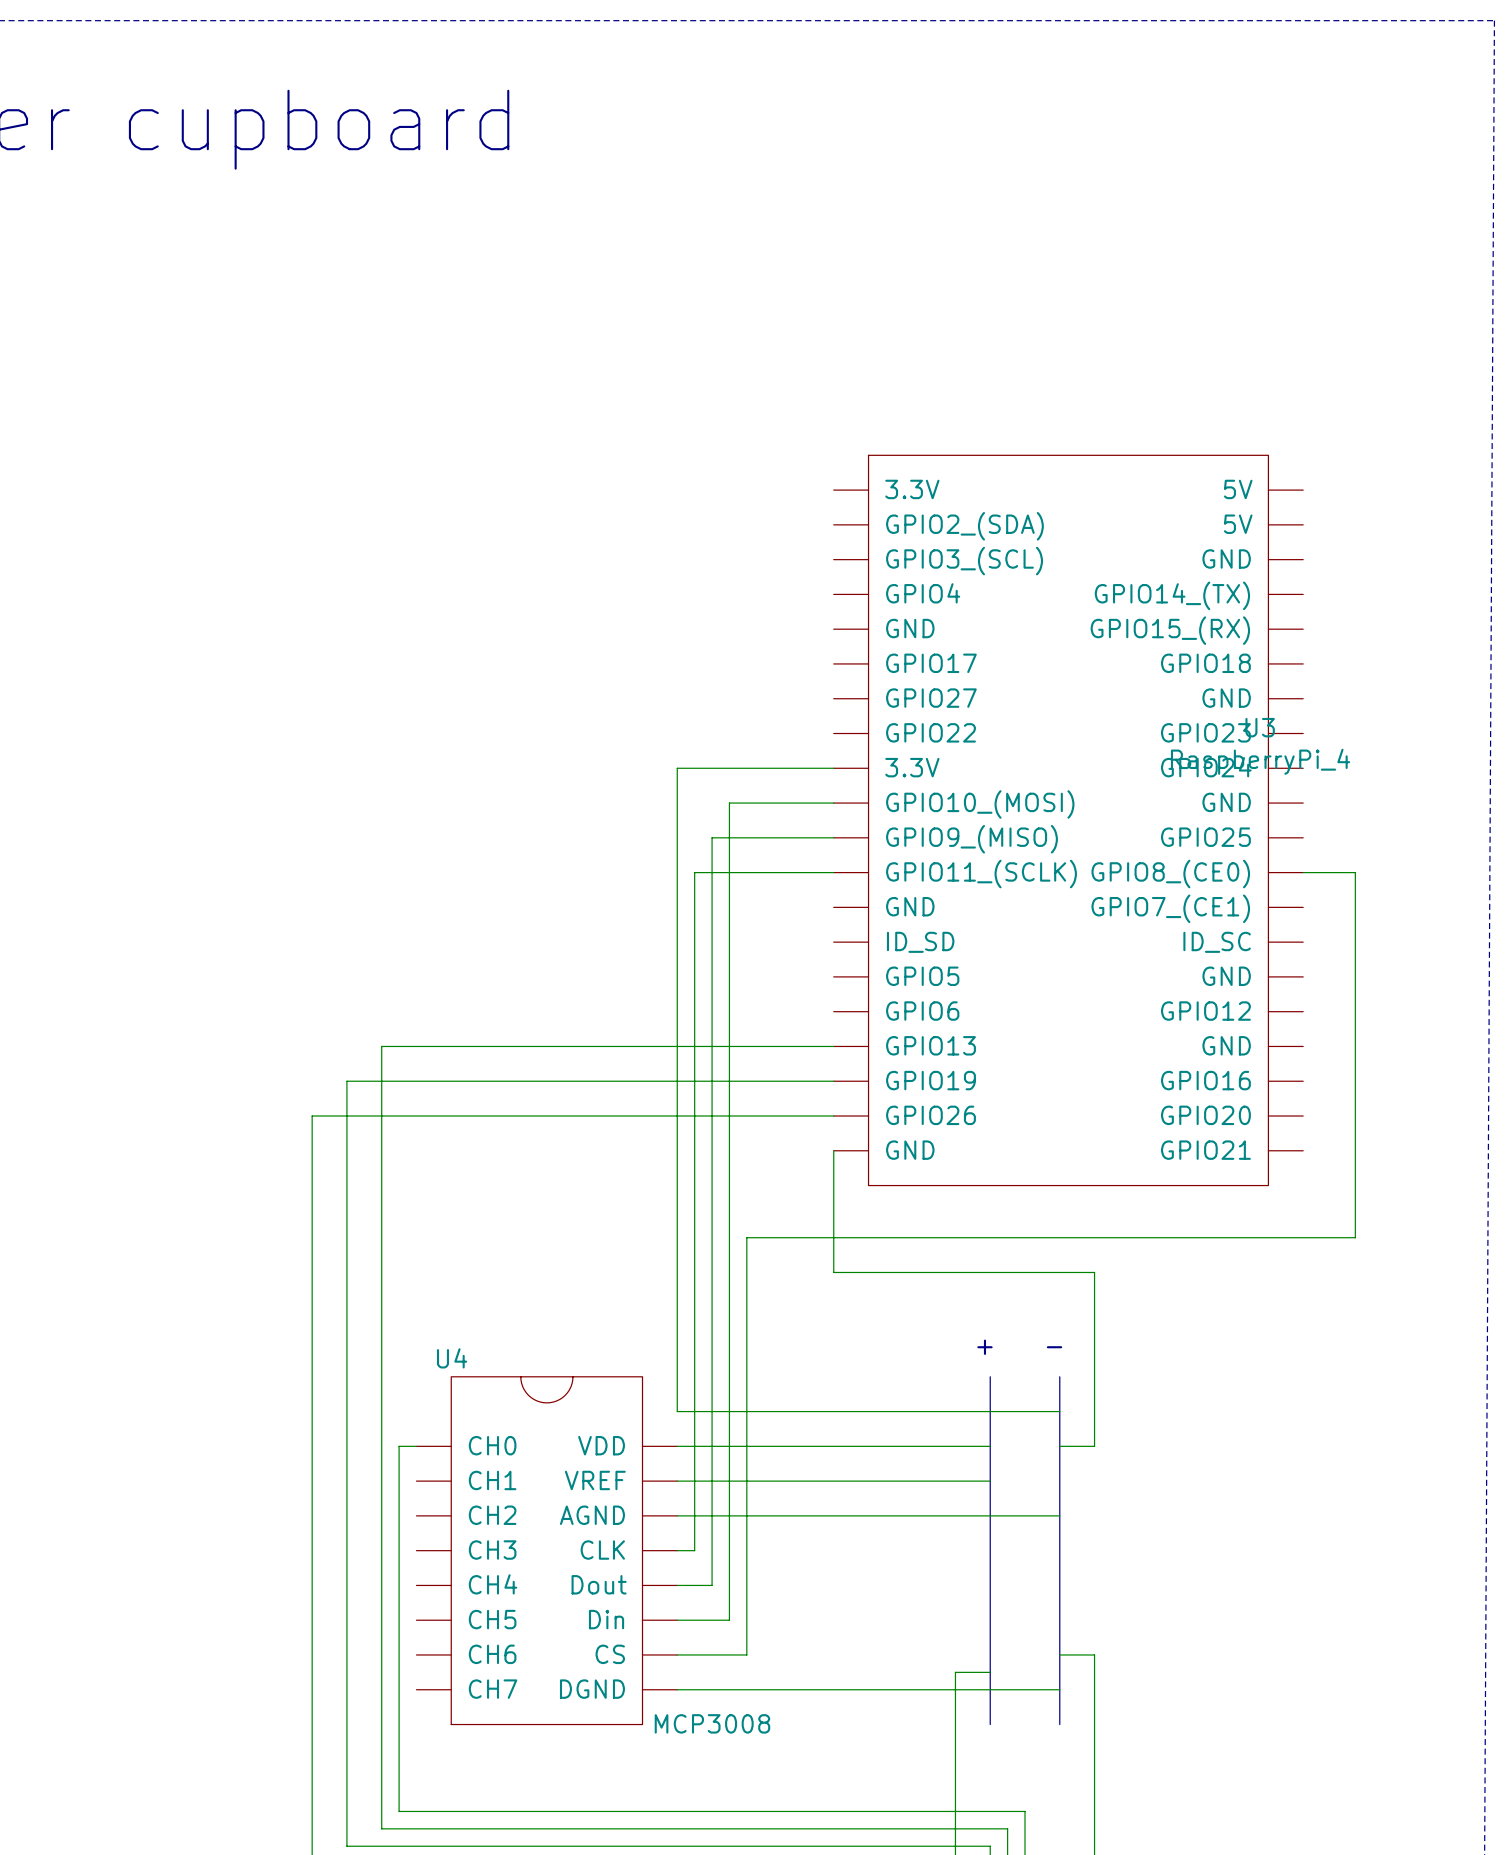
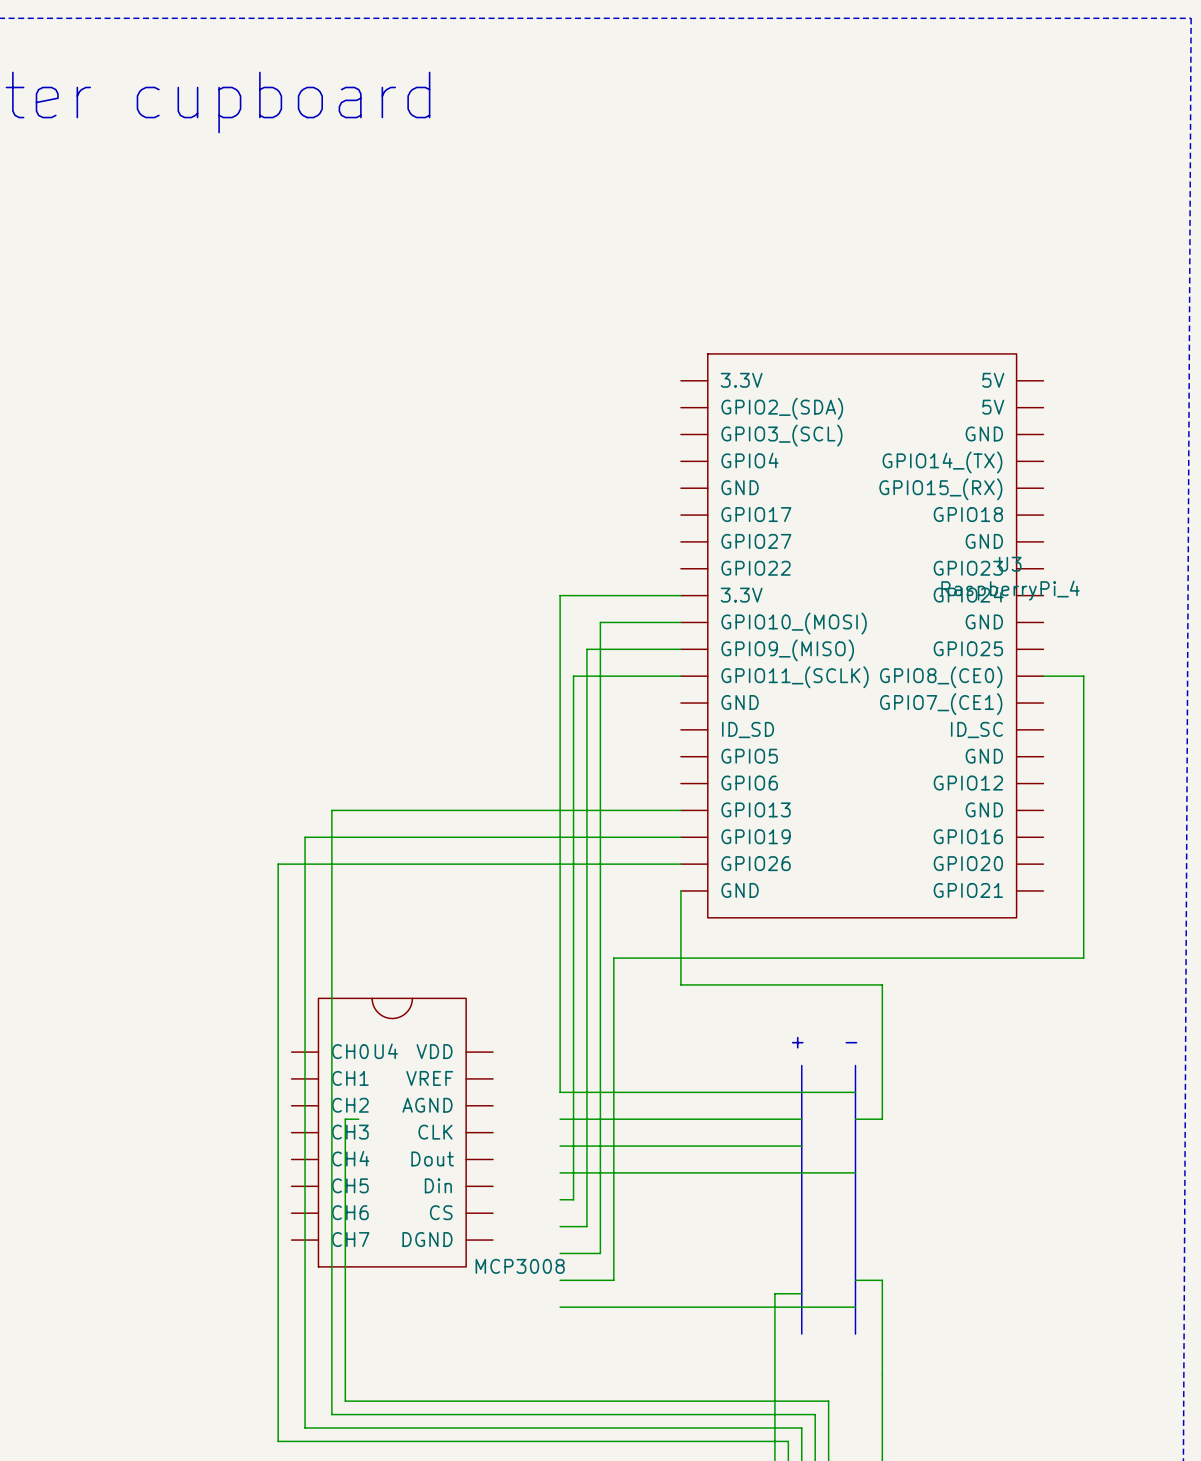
U4 position: (546, 1550) -> (392, 1132)

